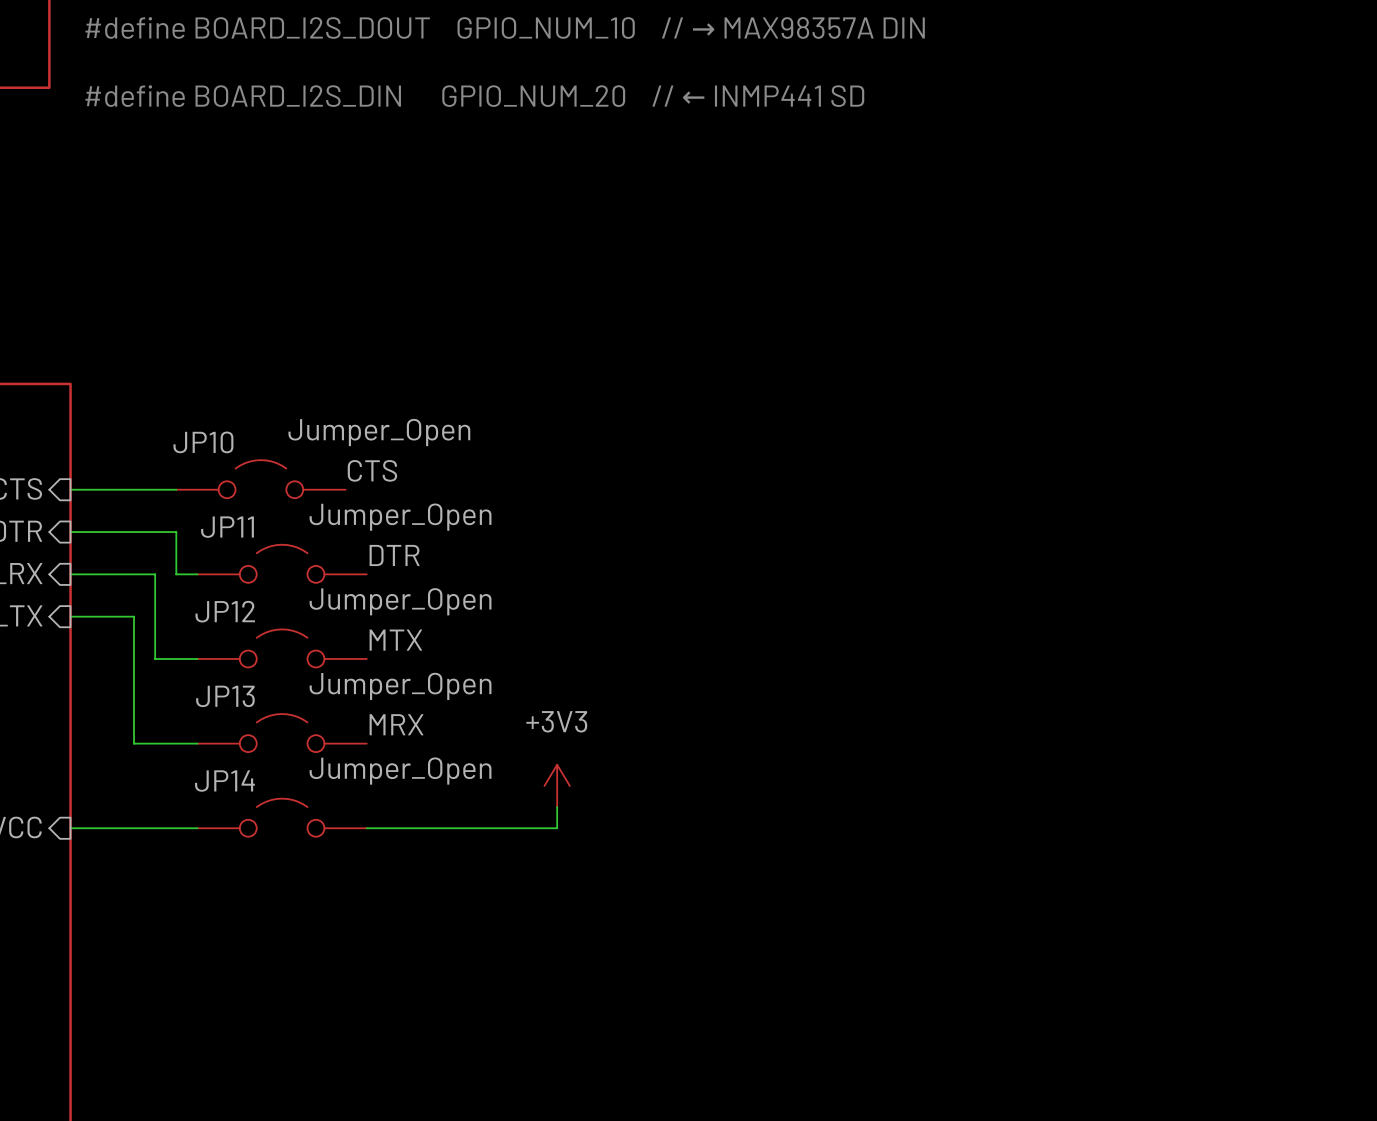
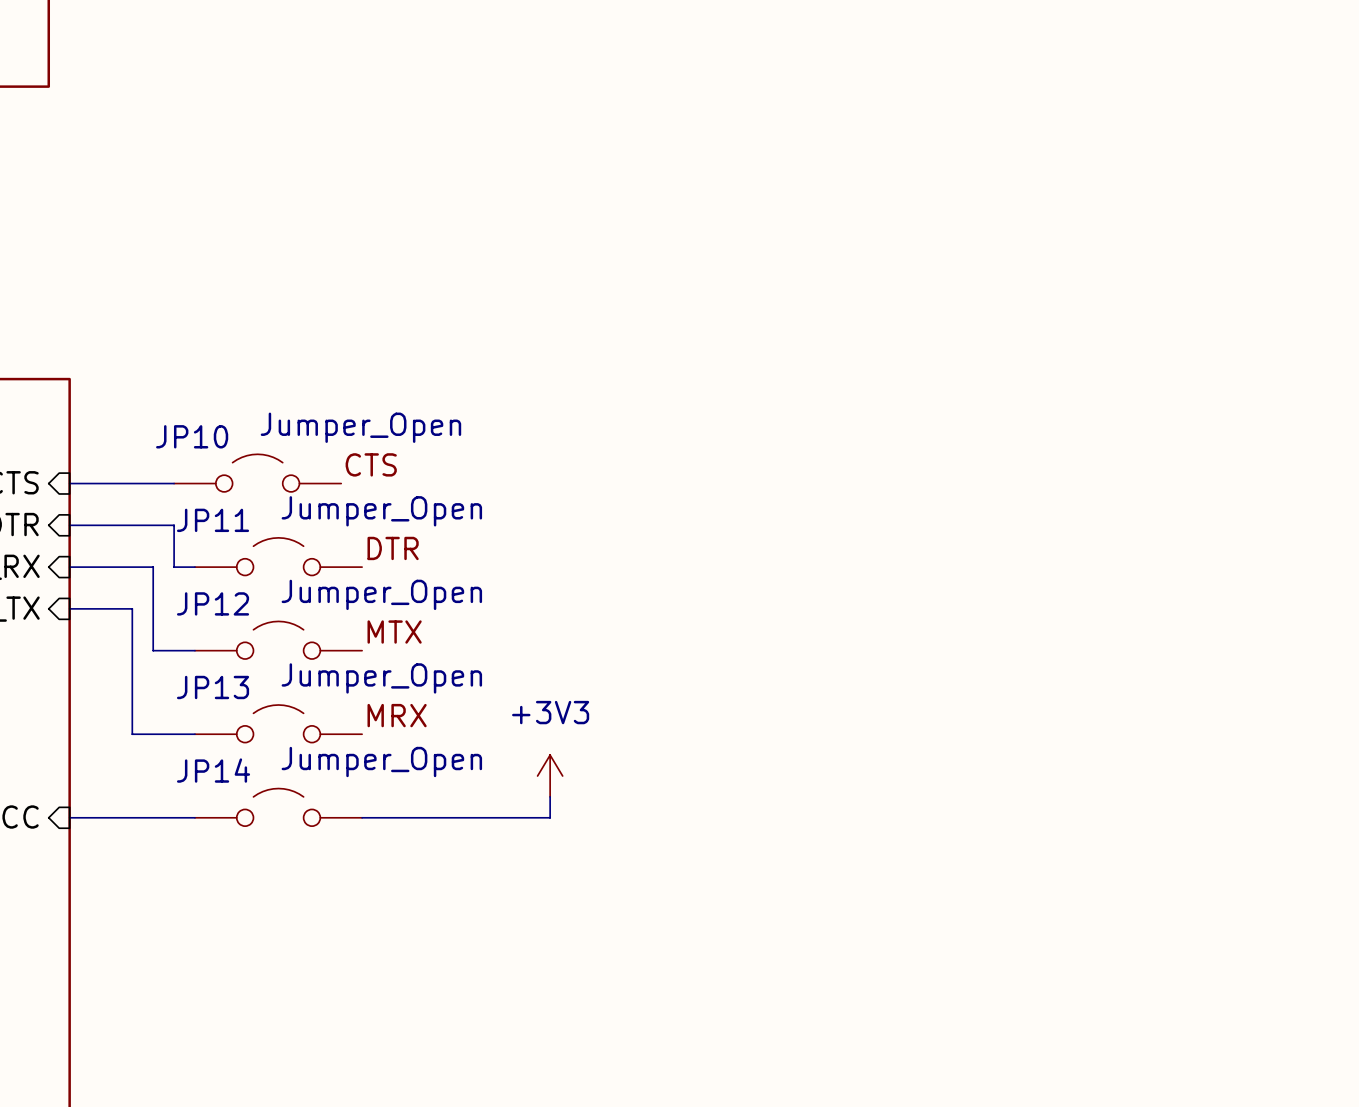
text: #define BOARD_I2S_DOUT GPIO_NUM_10 // → MAX98357A DIN (505, 27) -> none
text: #define BOARD_I2S_DIN GPIO_NUM_20 // ← INMP441 SD (474, 96) -> none

